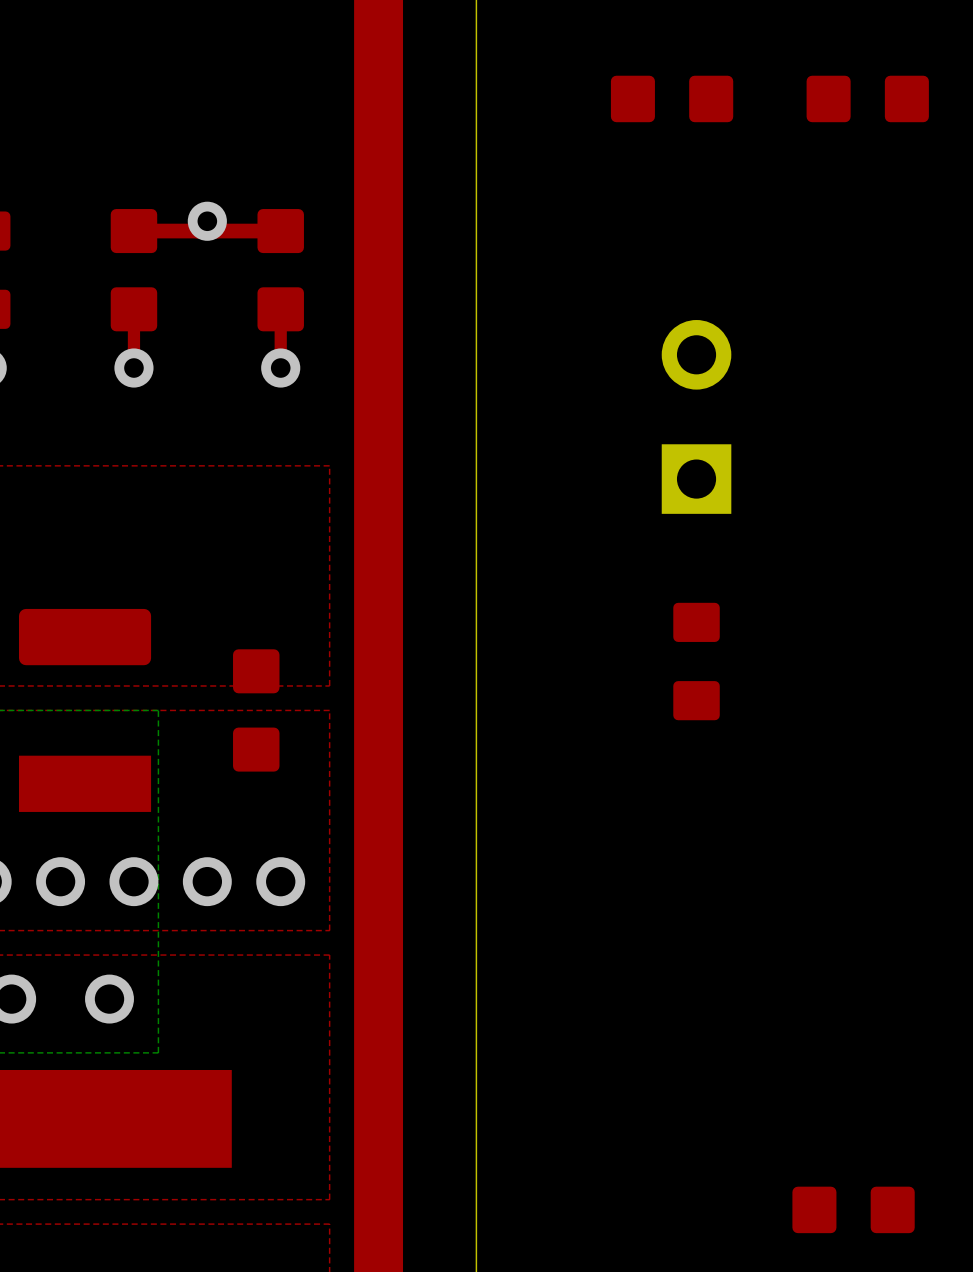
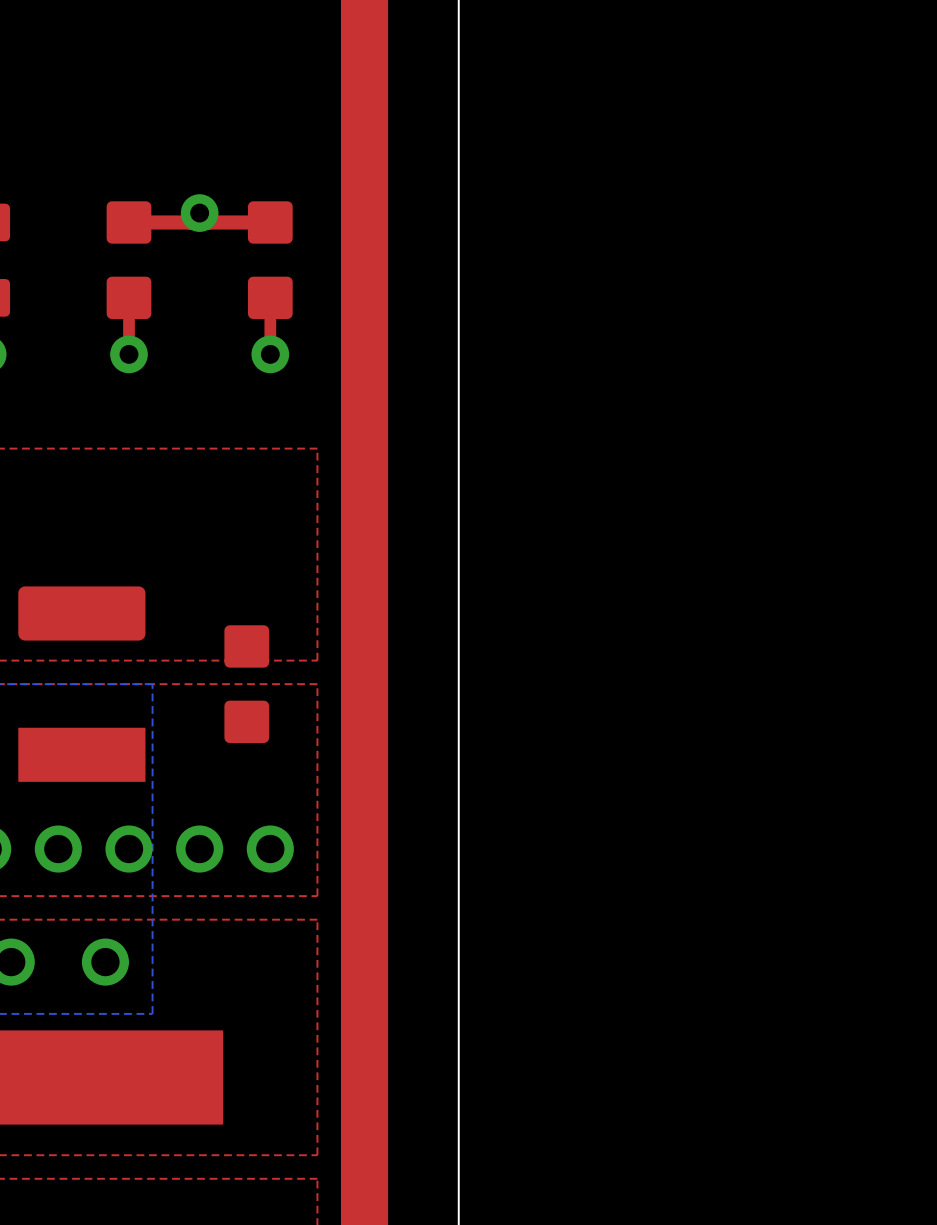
part: (672, 98) -> none
part: (867, 98) -> none
part: (696, 416) -> none
part: (696, 661) -> none
part: (853, 1209) -> none

